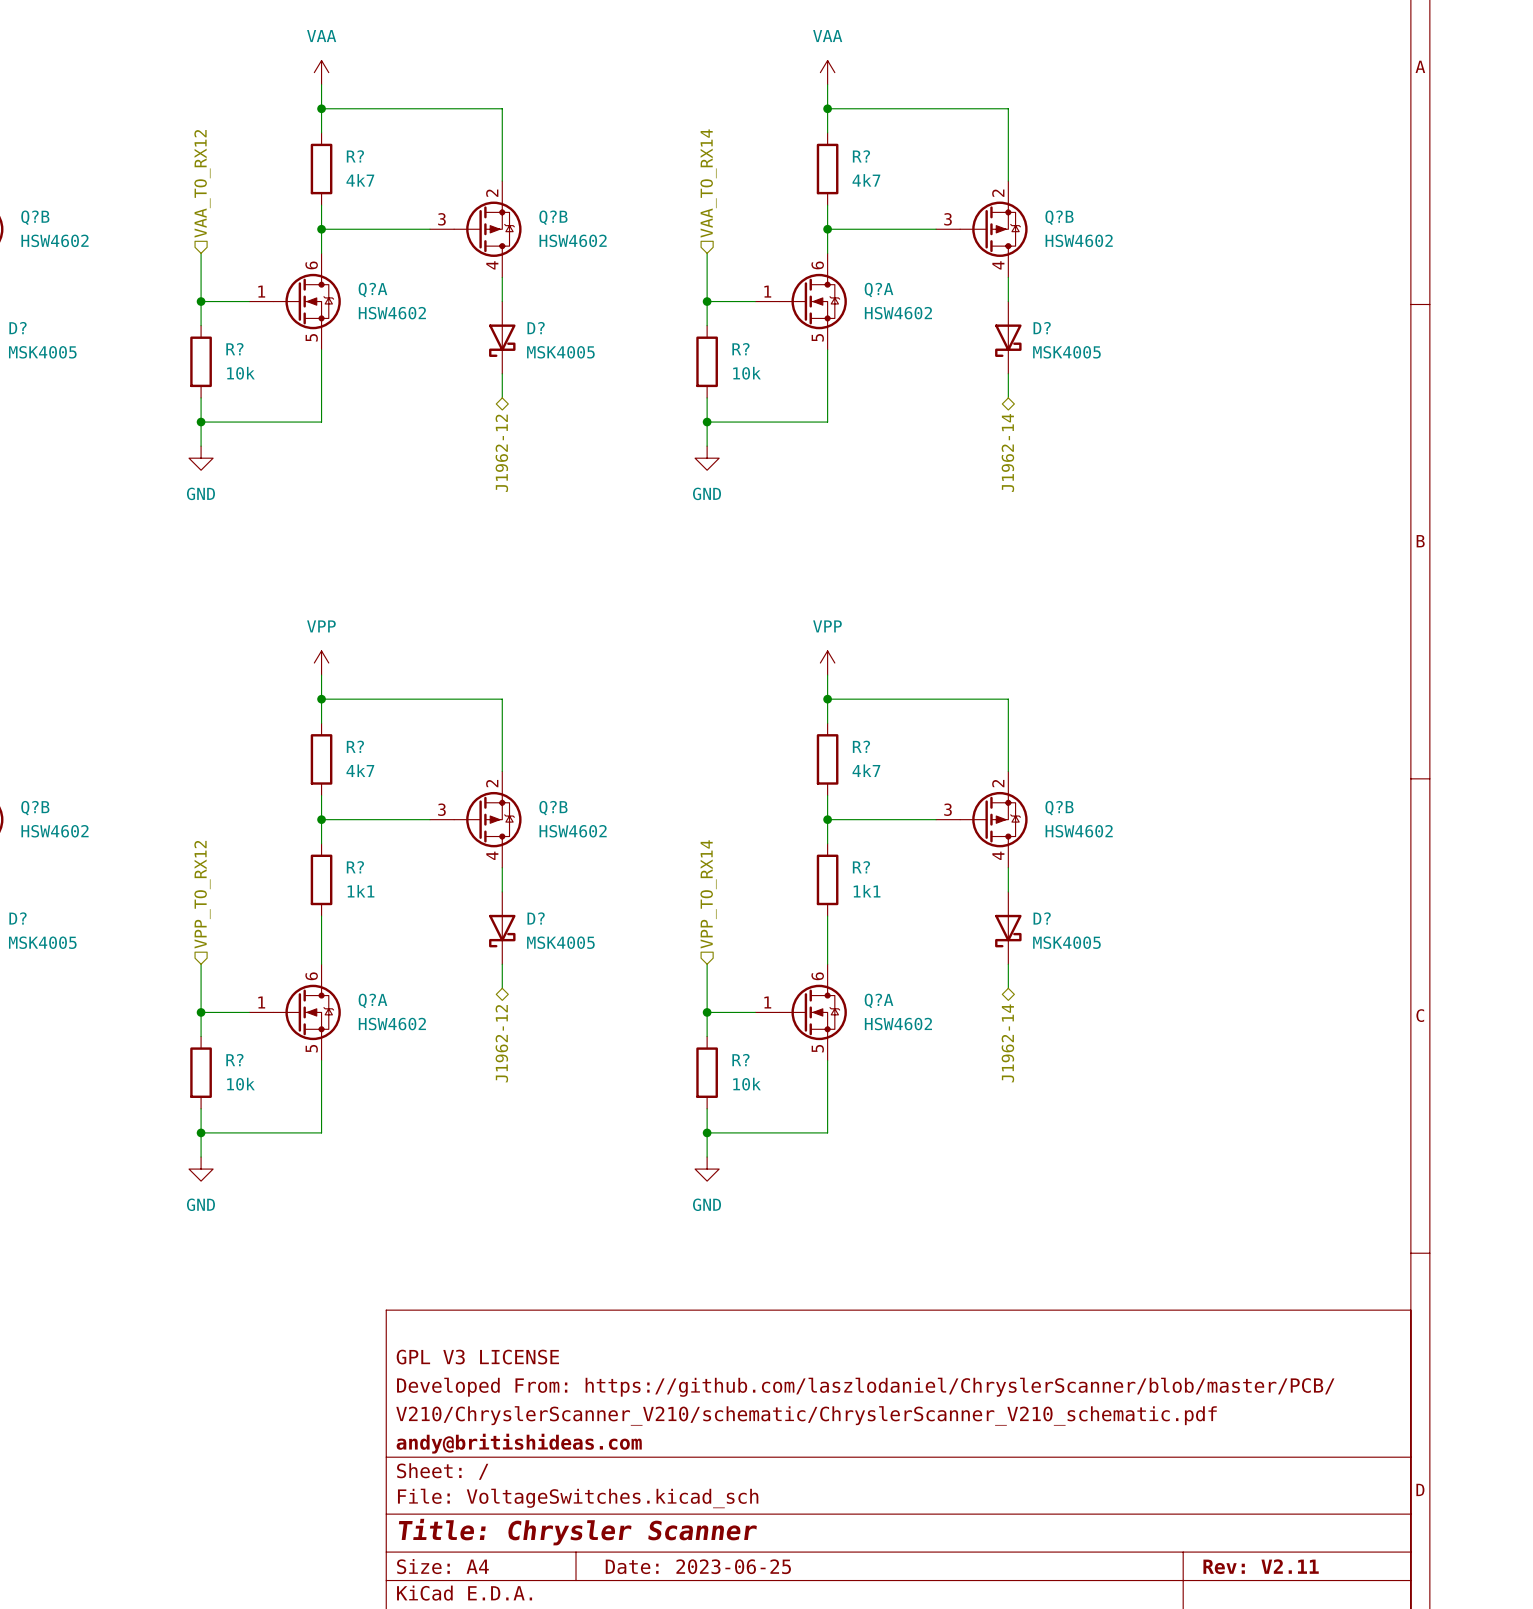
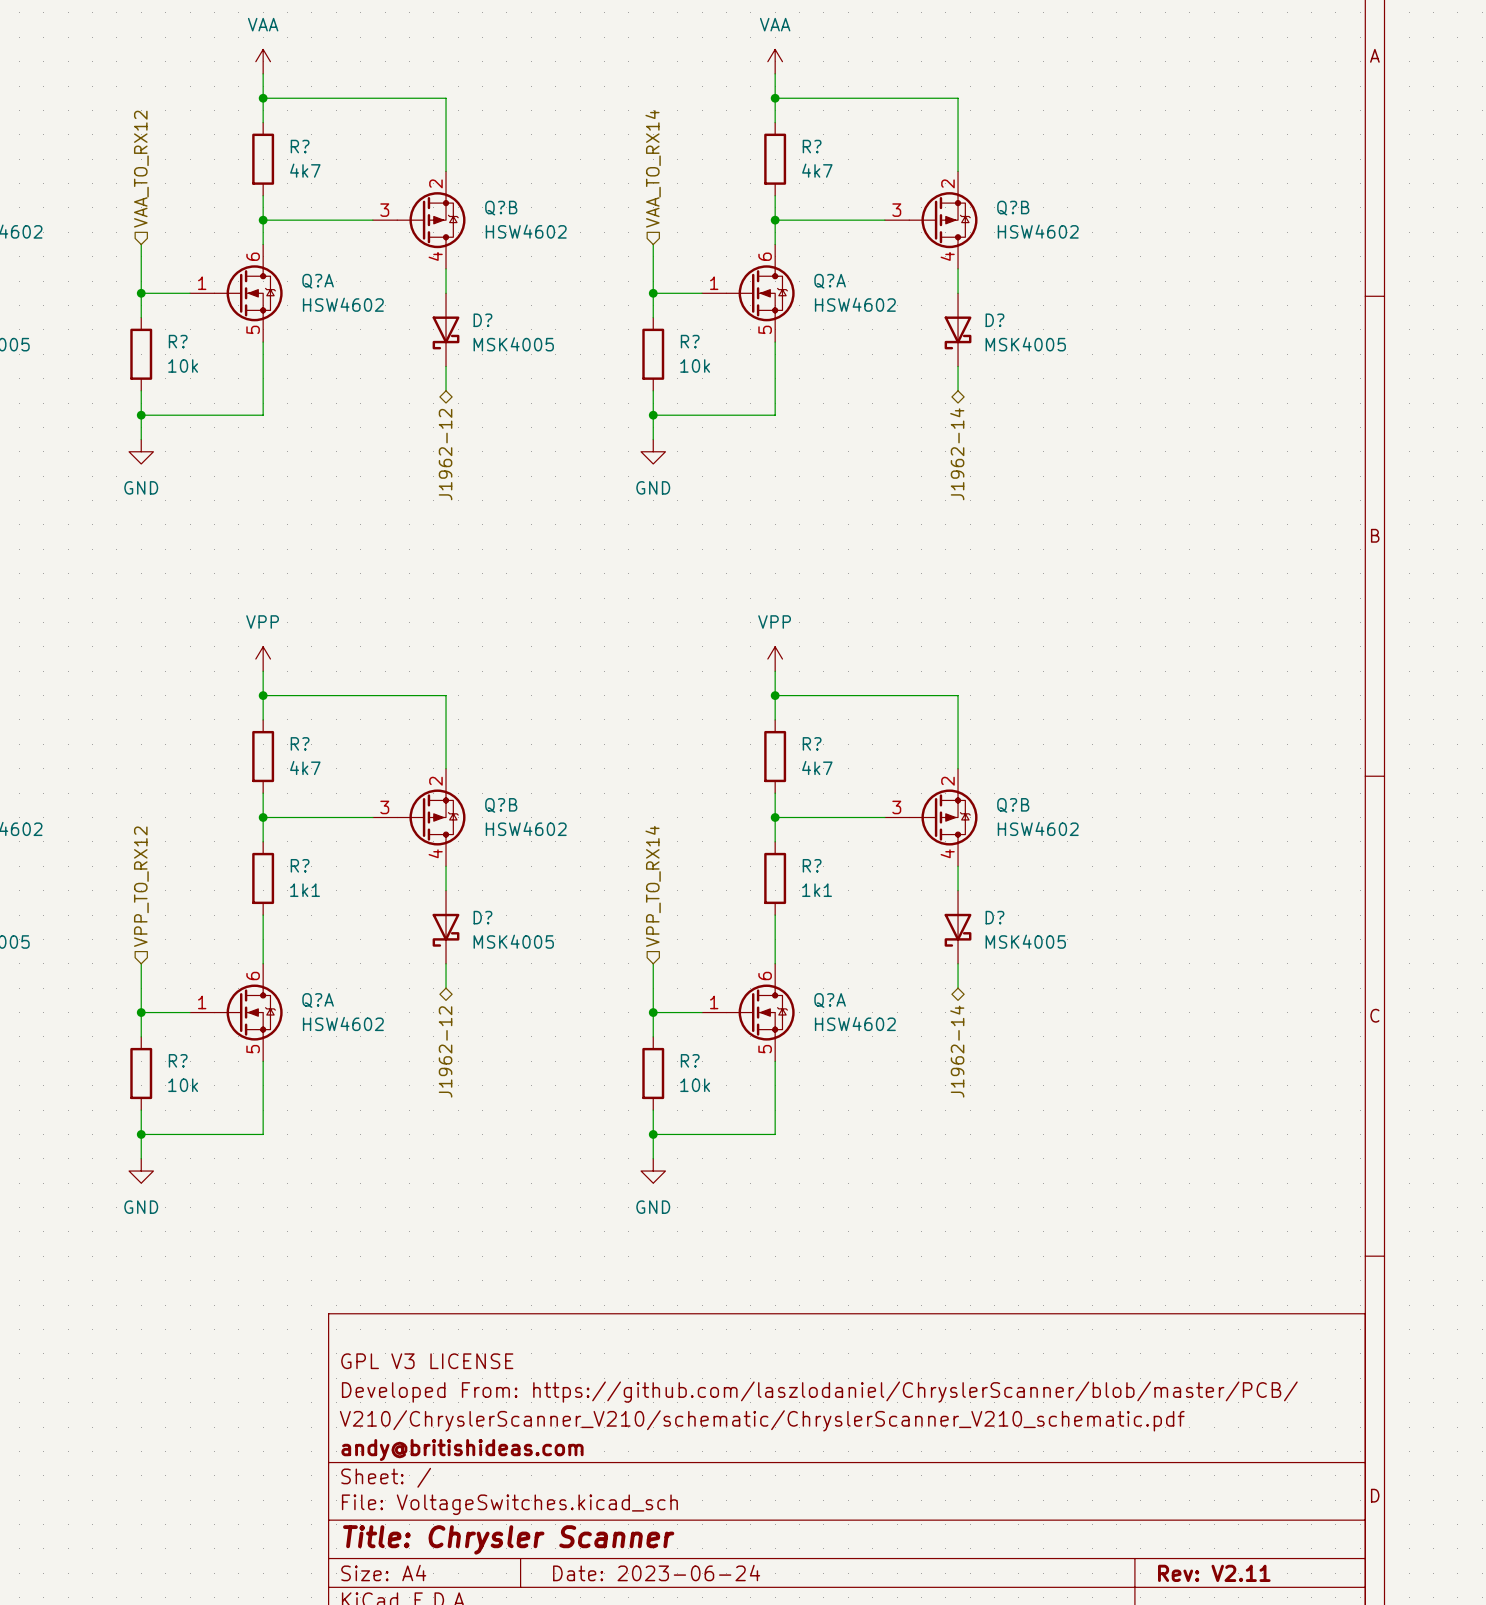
title block: Date: 2023-06-25 (698, 1566) -> Date: 2023-06-24 (656, 1573)

